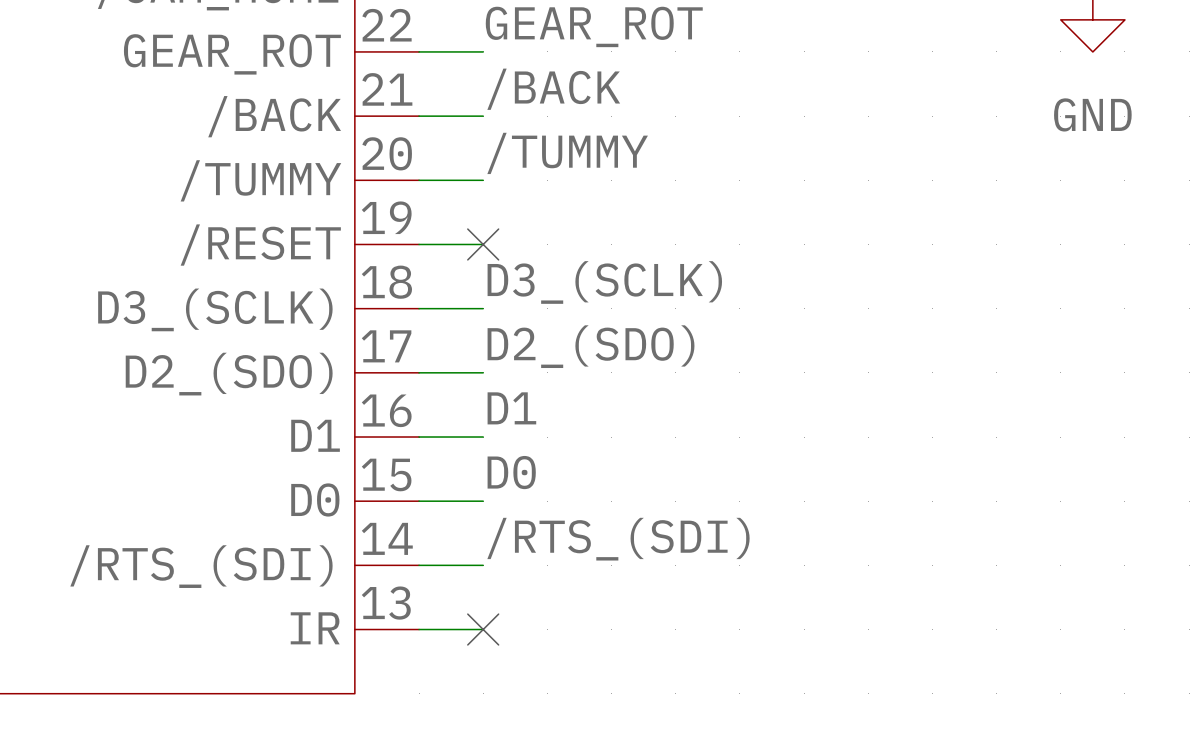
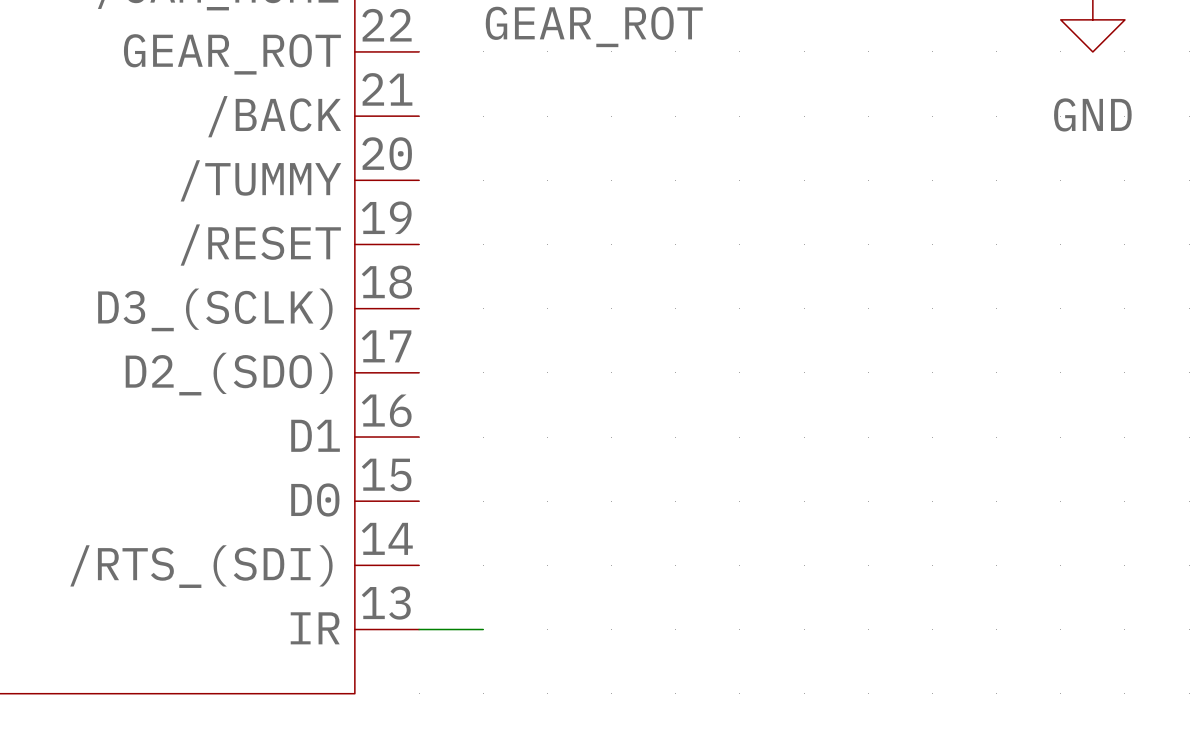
wire: (419, 51) (483, 51) -> none
label: /BACK (553, 89) -> none
wire: (419, 116) (483, 116) -> none
label: /TUMMY (567, 153) -> none
wire: (419, 180) (483, 180) -> none
wire: (419, 244) (483, 244) -> none
no-connect mark: (483, 244) -> none
label: D3_(SCLK) (604, 282) -> none
wire: (419, 308) (483, 308) -> none
label: D2_(SDO) (591, 346) -> none
wire: (419, 372) (483, 372) -> none
label: D1 (511, 408) -> none
wire: (419, 437) (483, 437) -> none
label: D0 (511, 472) -> none
wire: (419, 501) (483, 501) -> none
label: /RTS_(SDI) (618, 539) -> none
wire: (419, 565) (483, 565) -> none
no-connect mark: (483, 629) -> none

